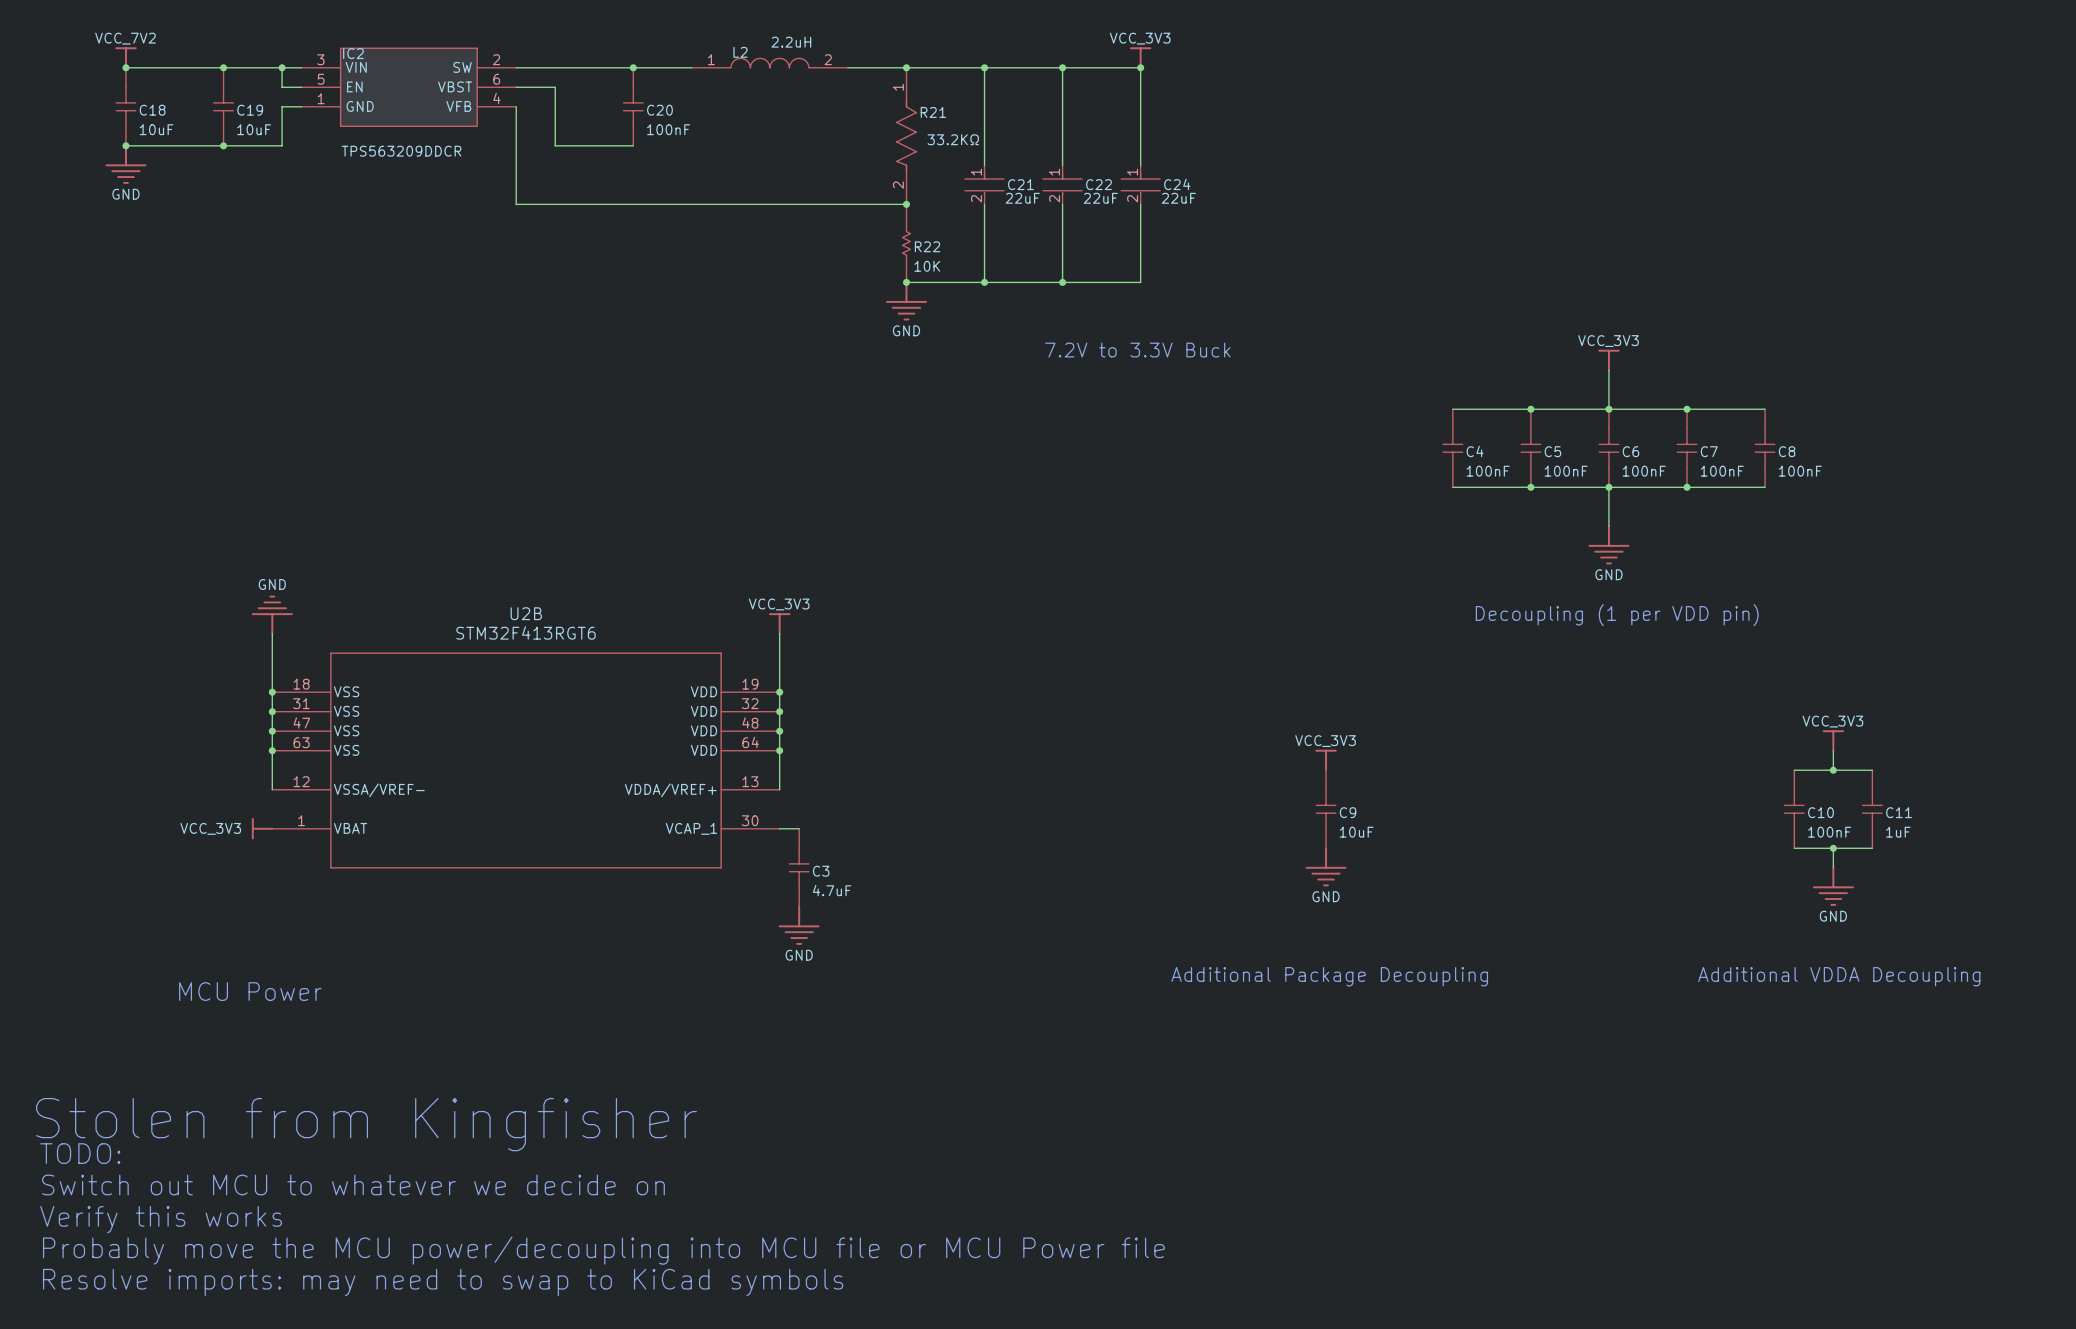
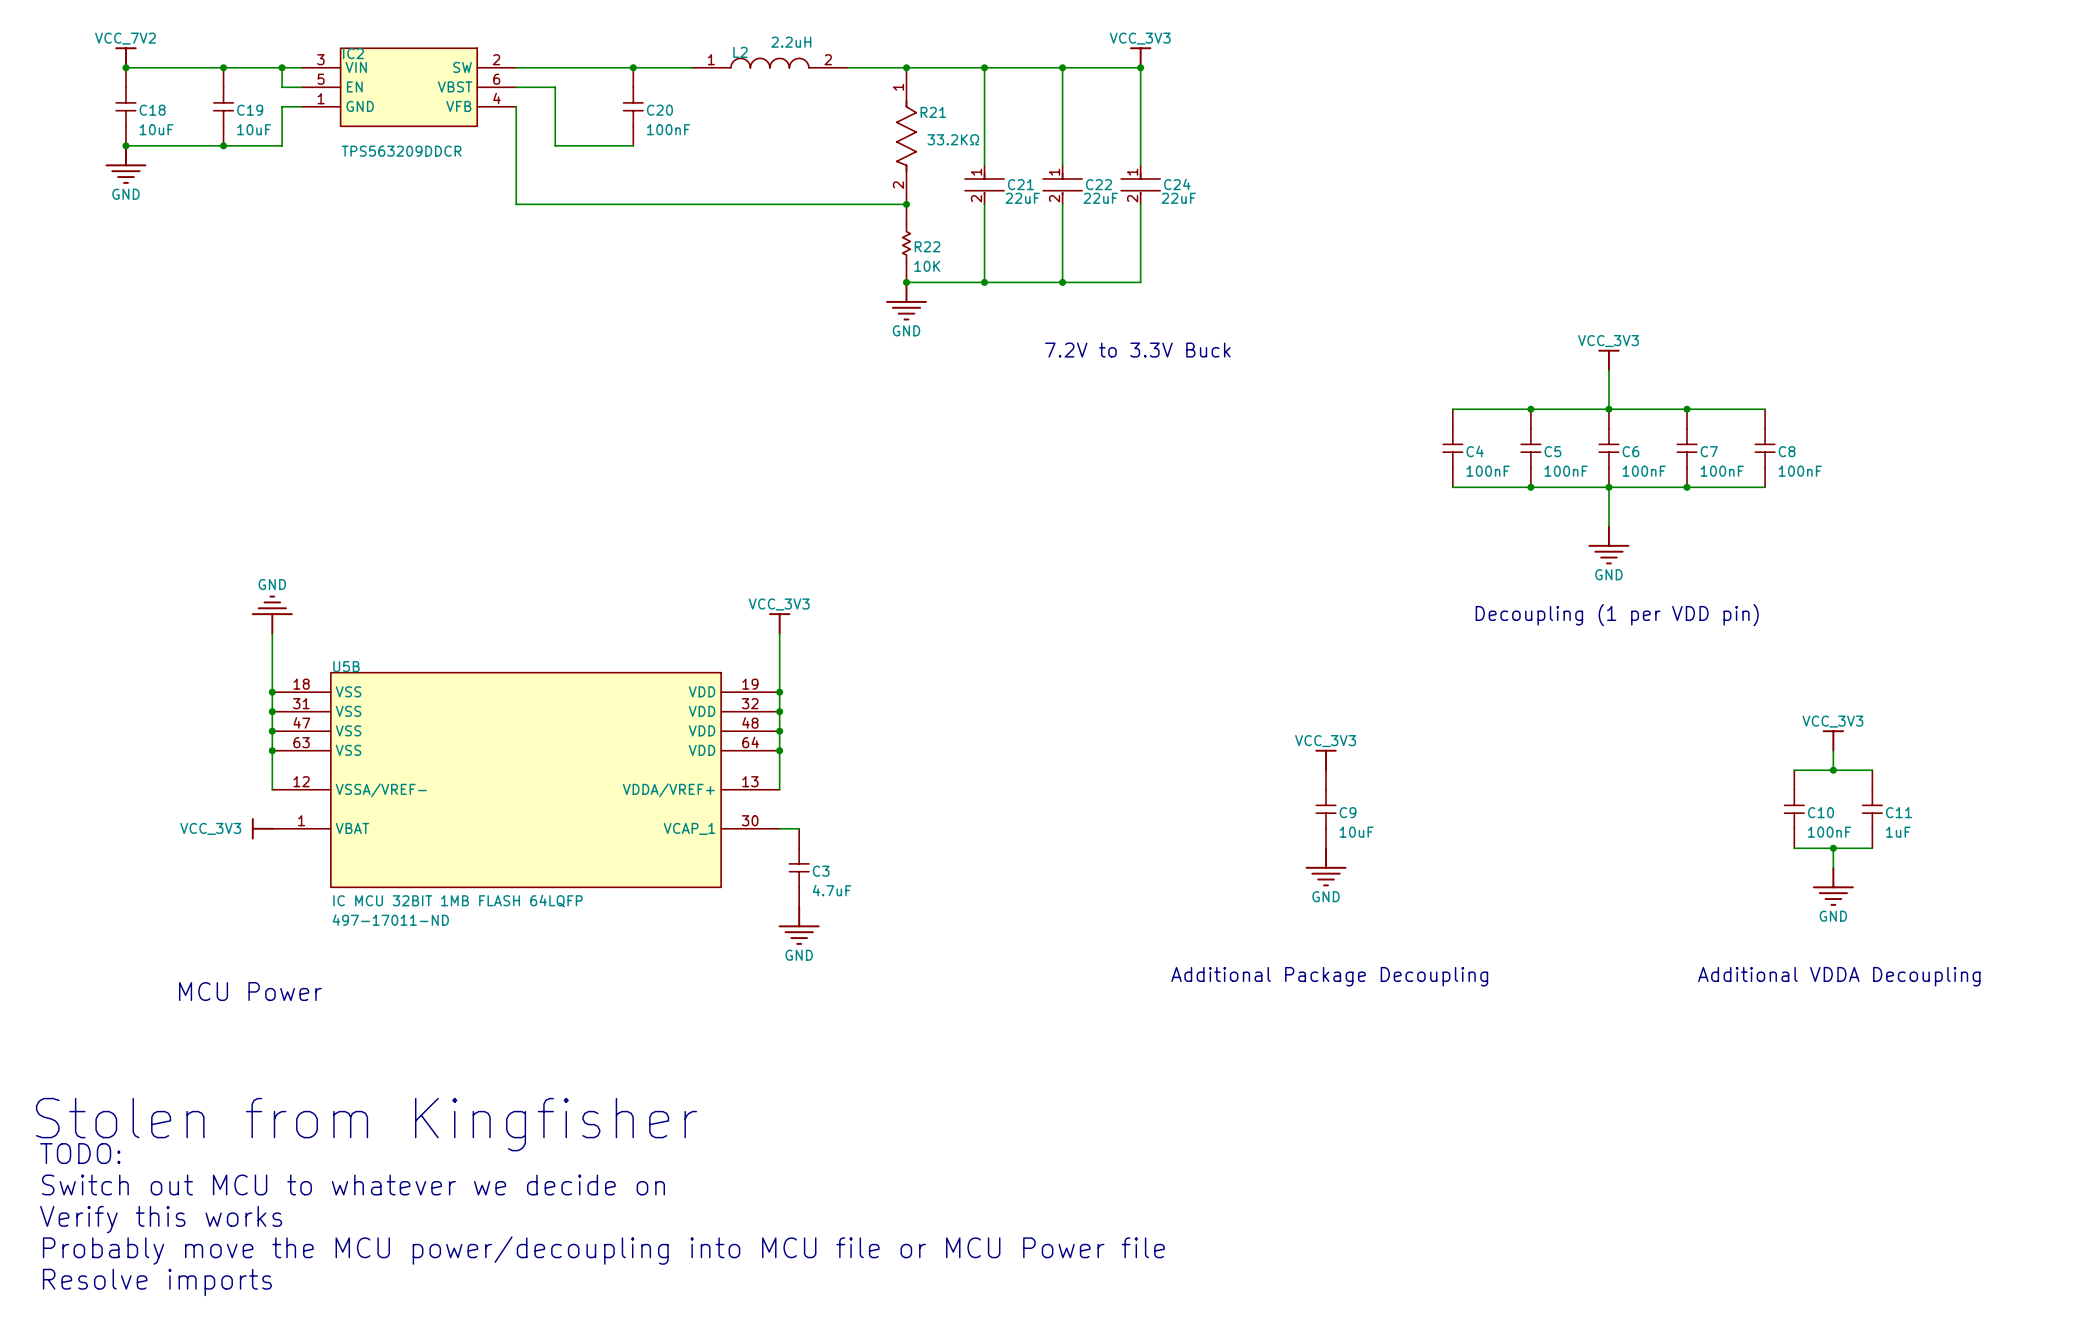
U2B: STM32F413RGT6 (525, 760) -> none
U5B: none -> IC MCU 32BIT 1MB FLASH 64LQFP (525, 780)
text: Resolve imports: may need to swap to KiCad symbols (443, 1282) -> Resolve imports (157, 1282)

